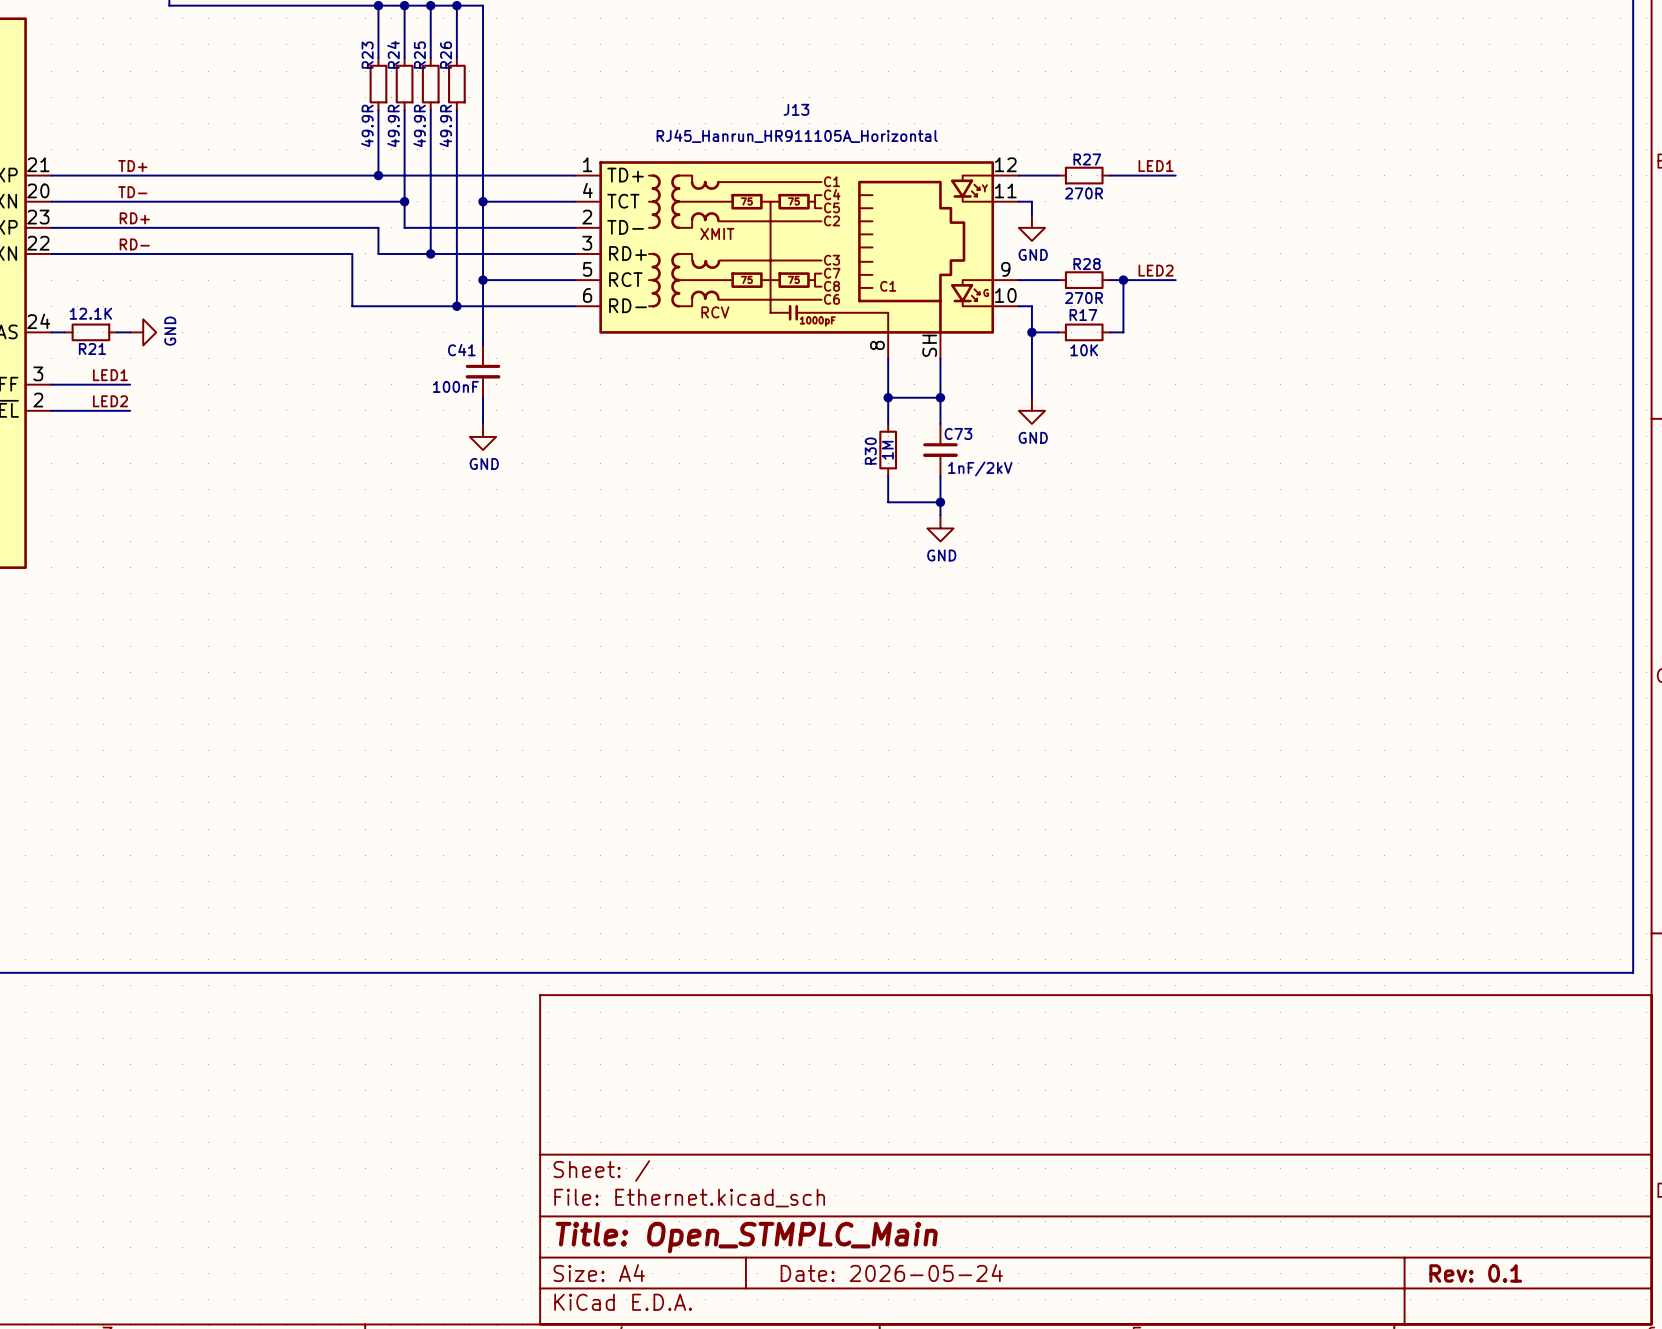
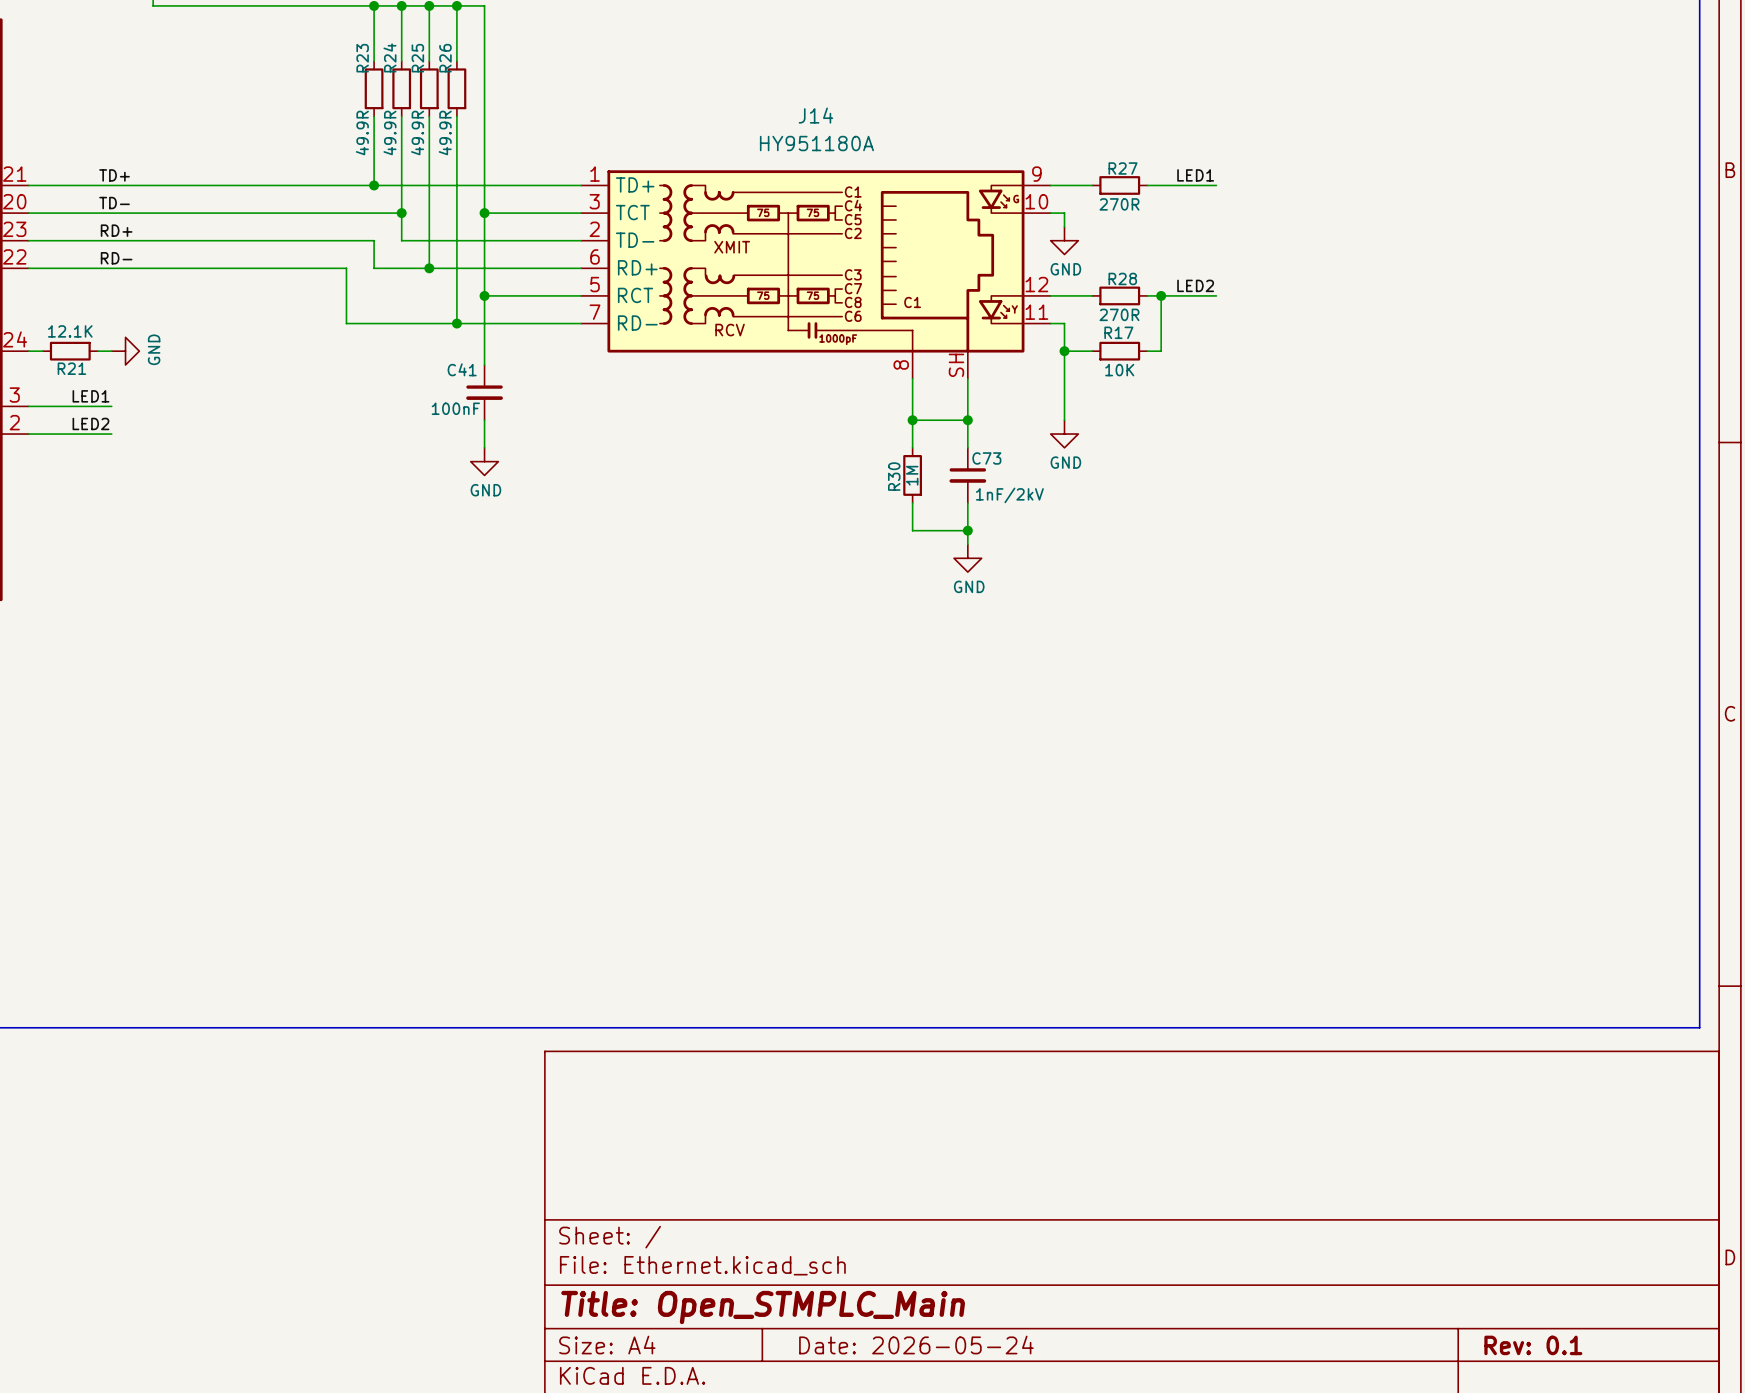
J13 name: J13 (796, 109) -> J14 (815, 115)
J13 value: RJ45_Hanrun_HR911105A_Horizontal (797, 136) -> HY951180A (816, 143)
J13 symbol: [574, 161, 1019, 359] -> [581, 170, 1051, 379]

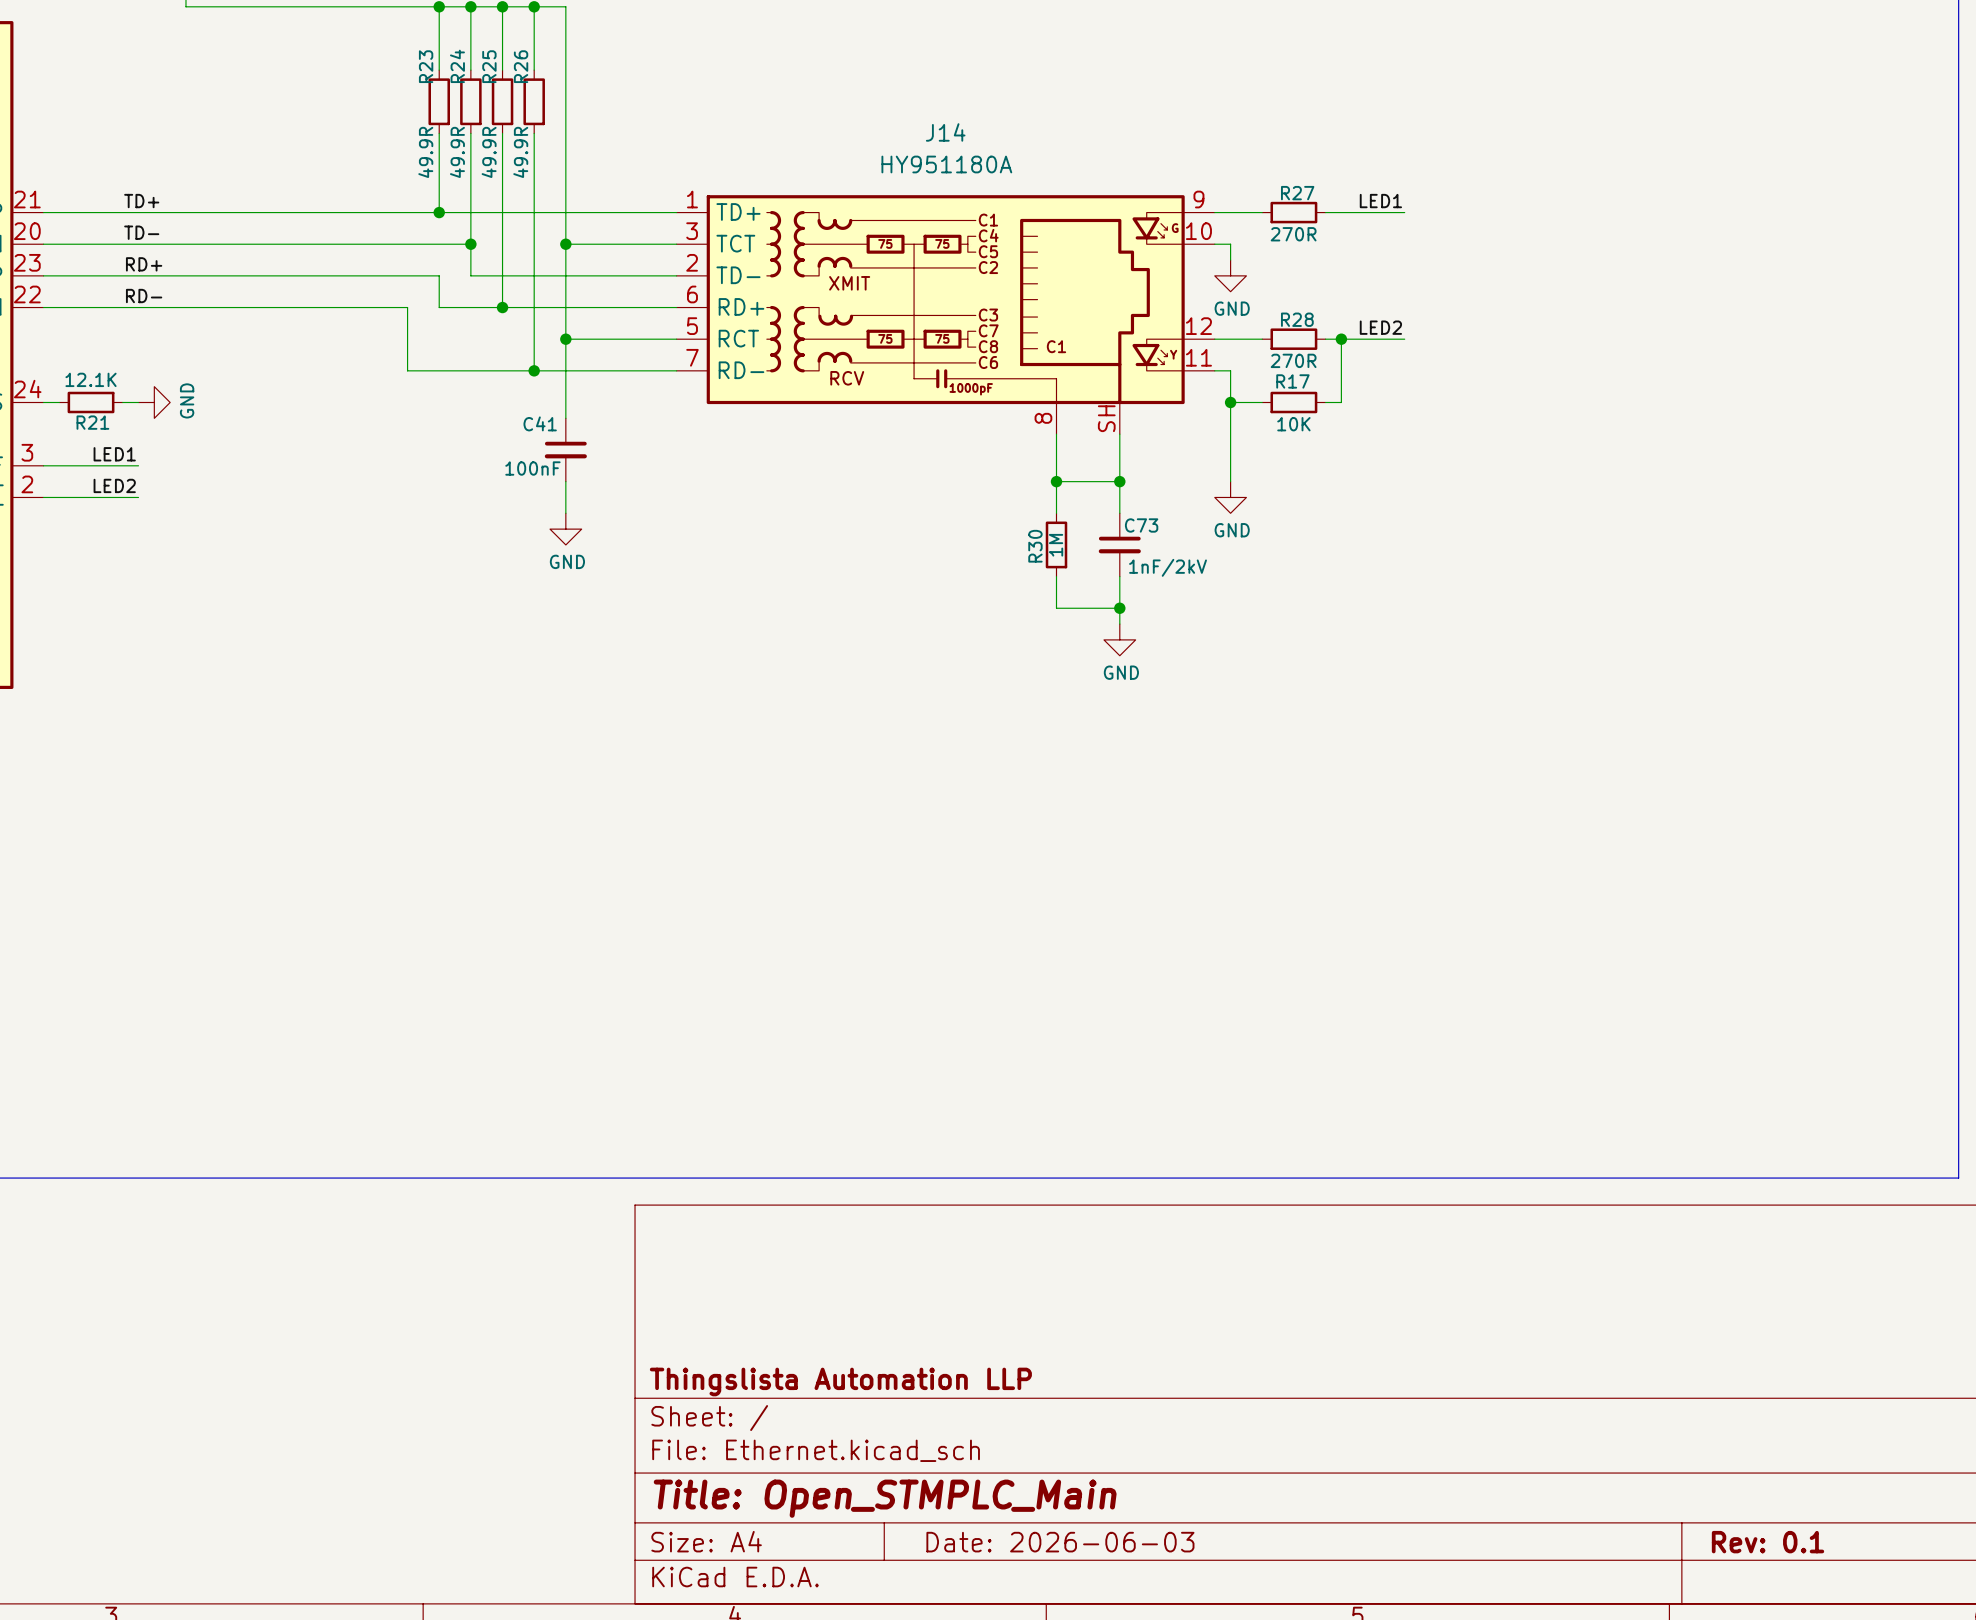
title block: none -> Thingslista Automation LLP (840, 1381)
title block: Date: 2026-05-24 (916, 1345) -> Date: 2026-06-03 (1060, 1542)

